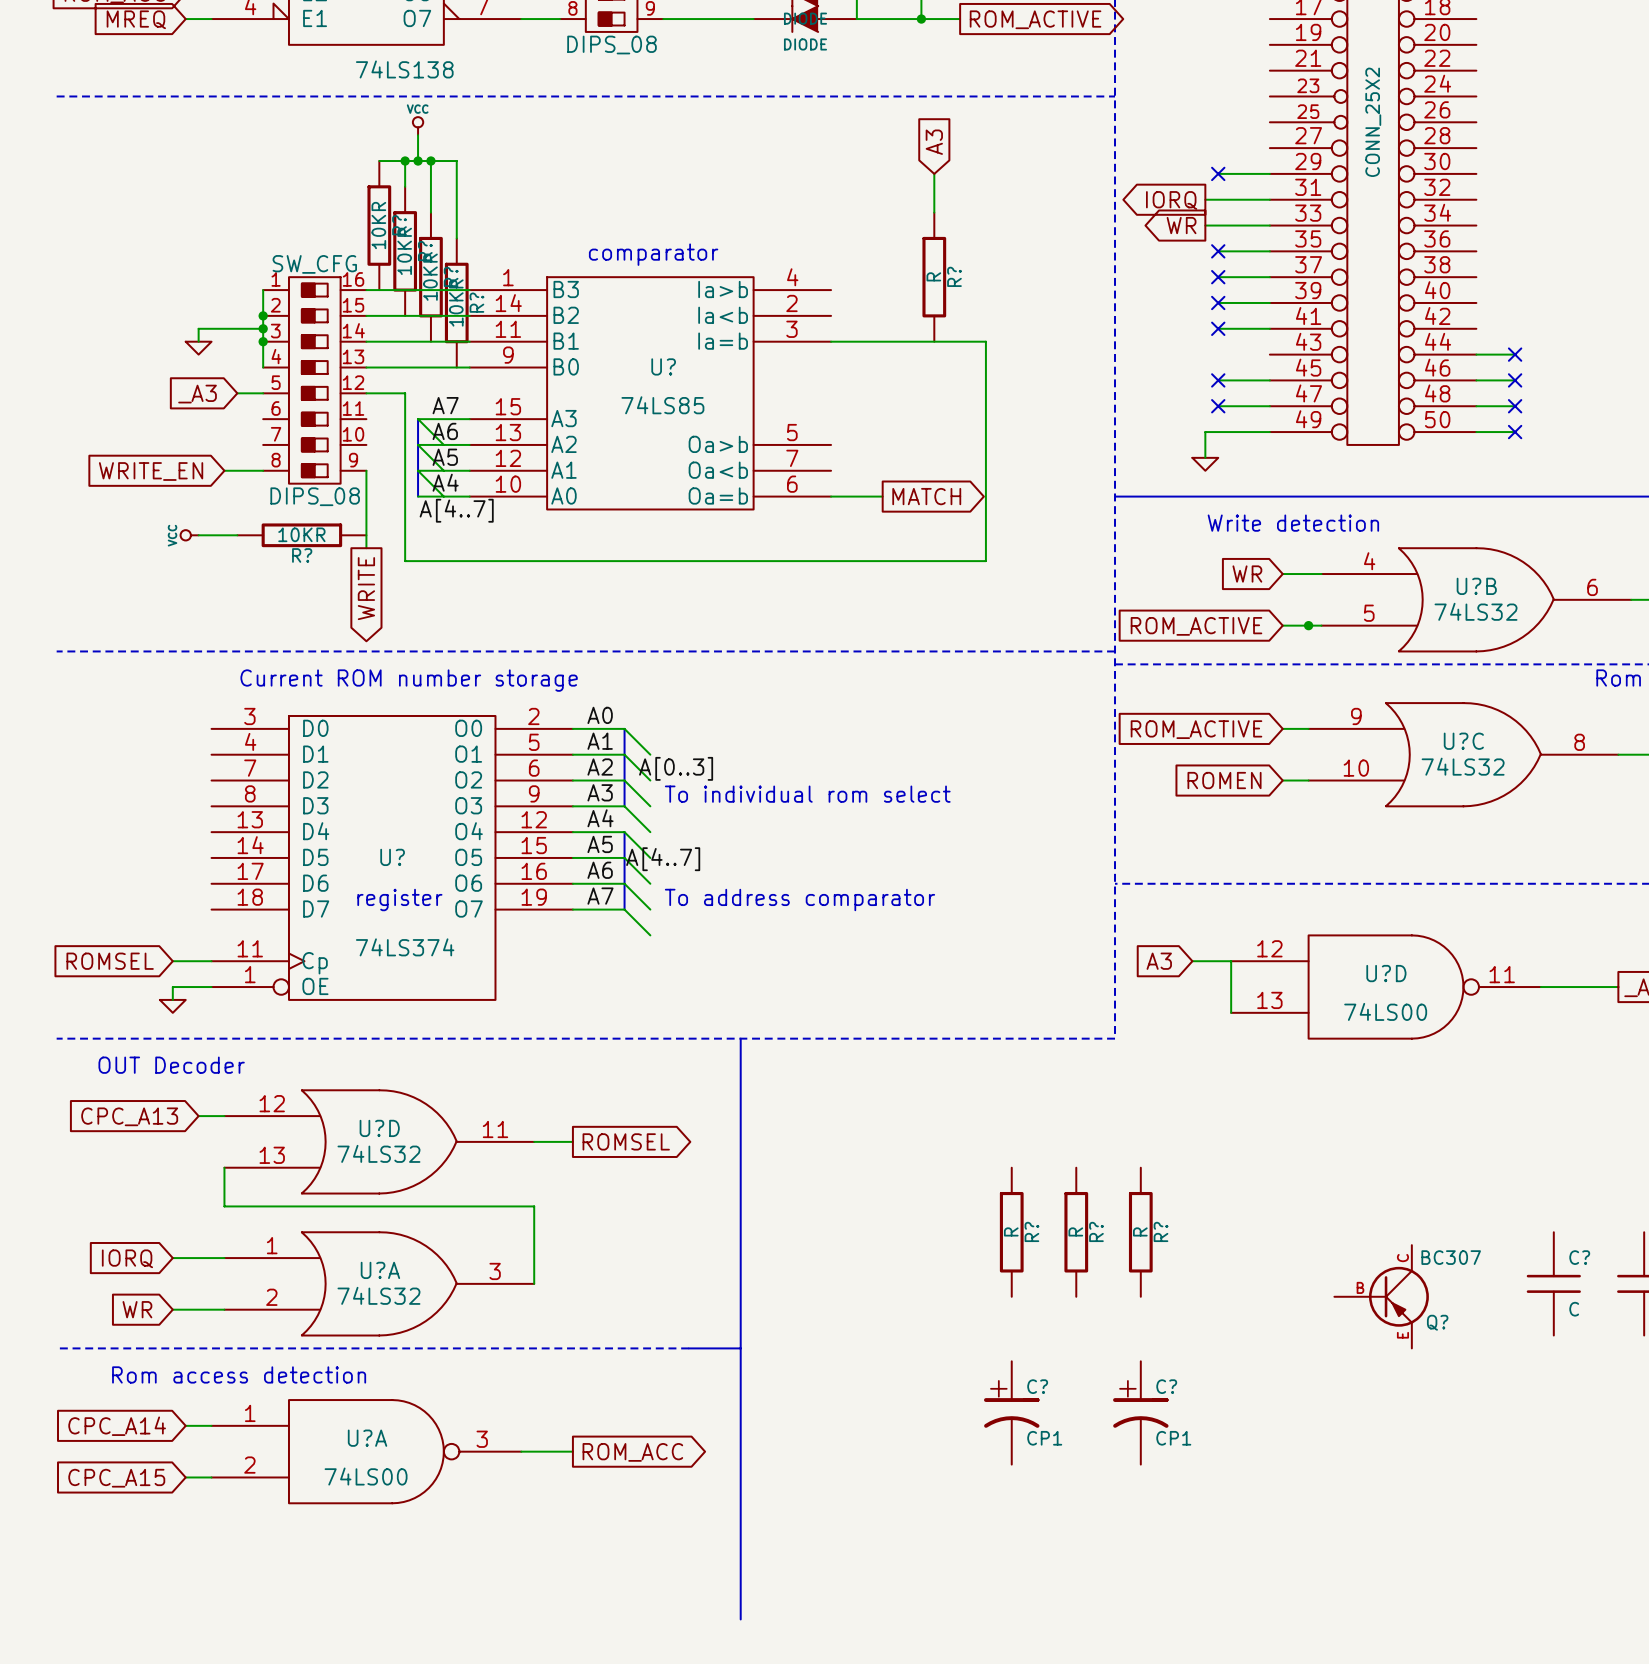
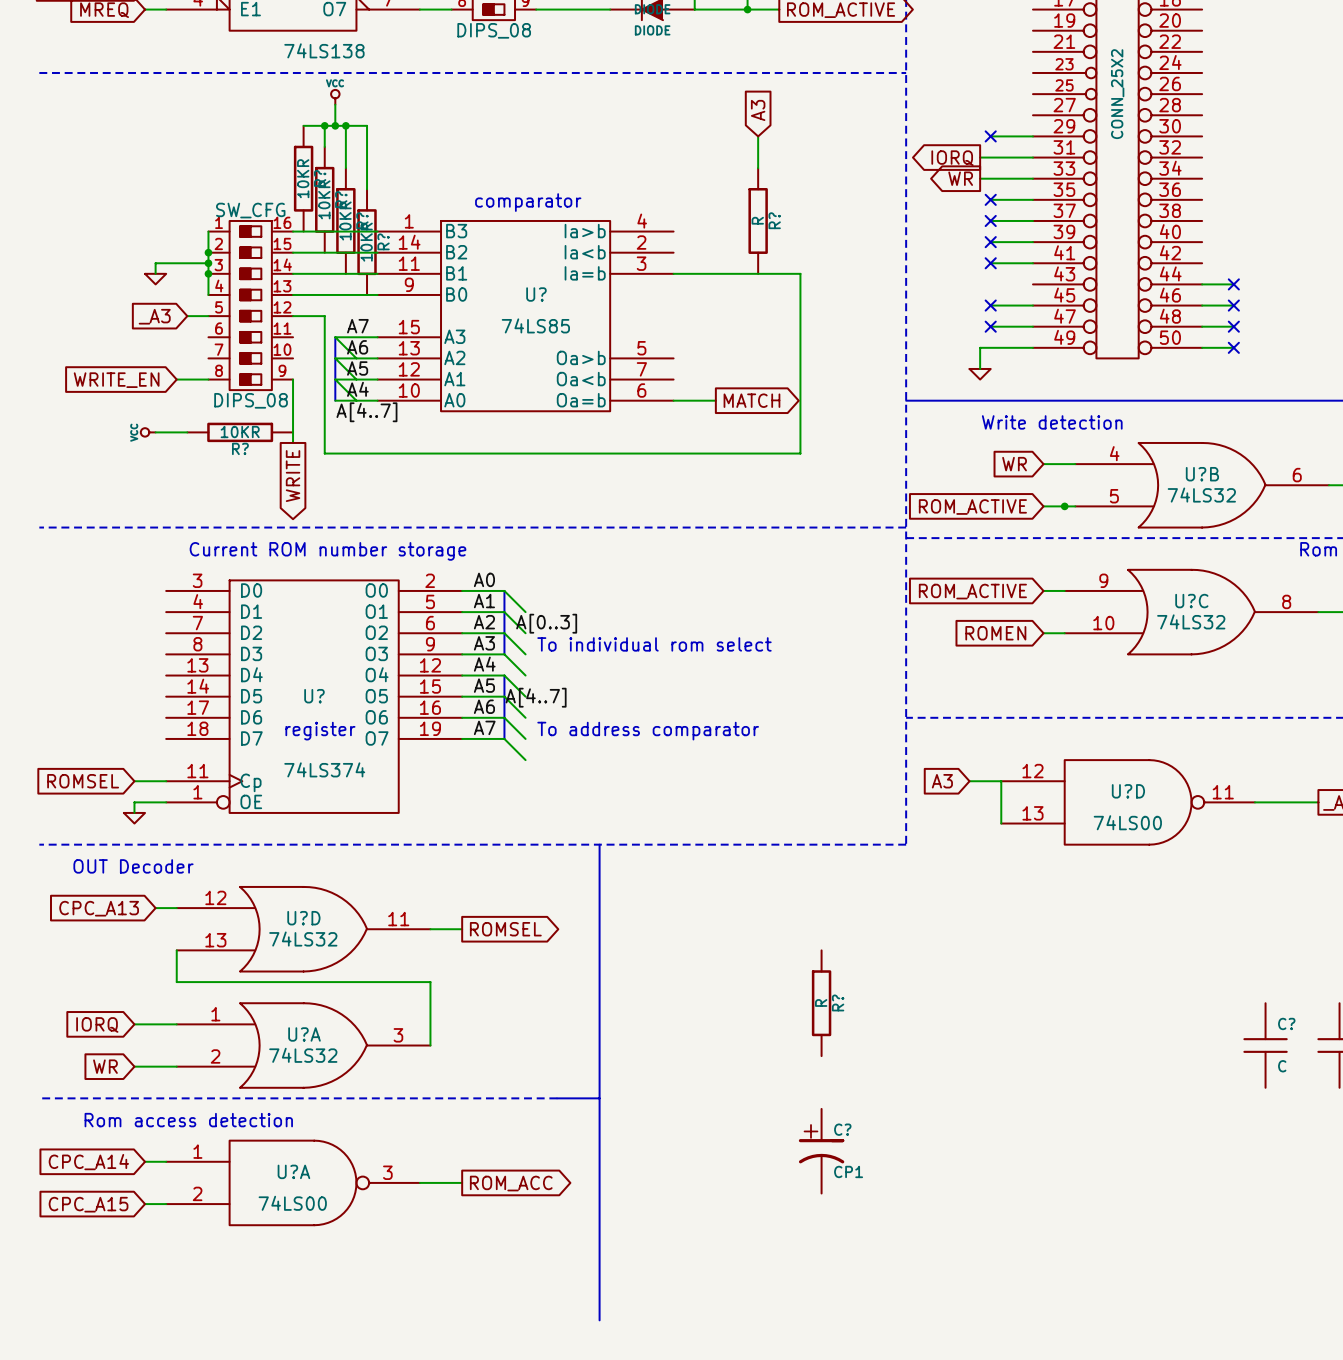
R?: R (1076, 1232) -> none
R?: R (1140, 1232) -> none
Q?: BC307 (1381, 1296) -> none
C?: CP1 (1140, 1412) -> none

